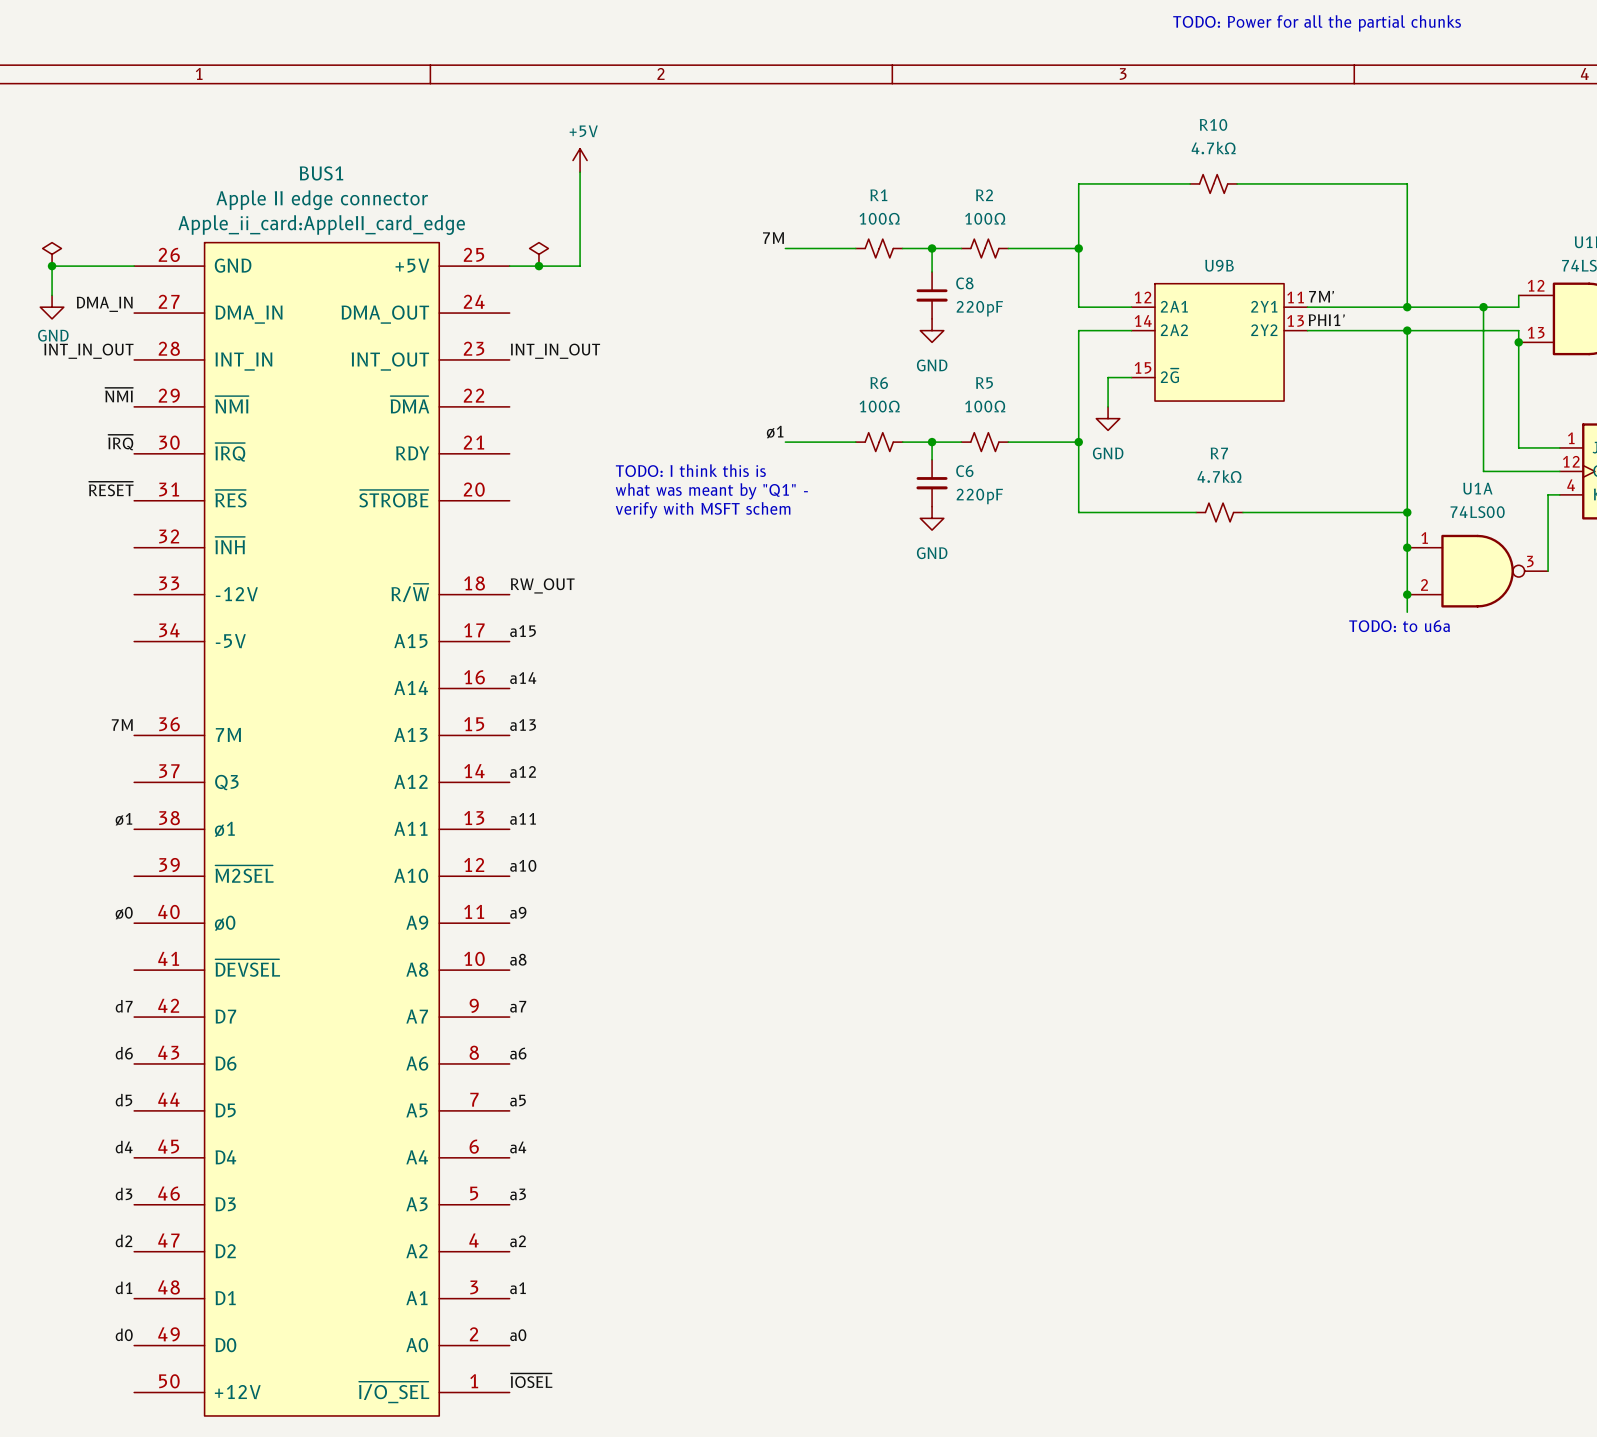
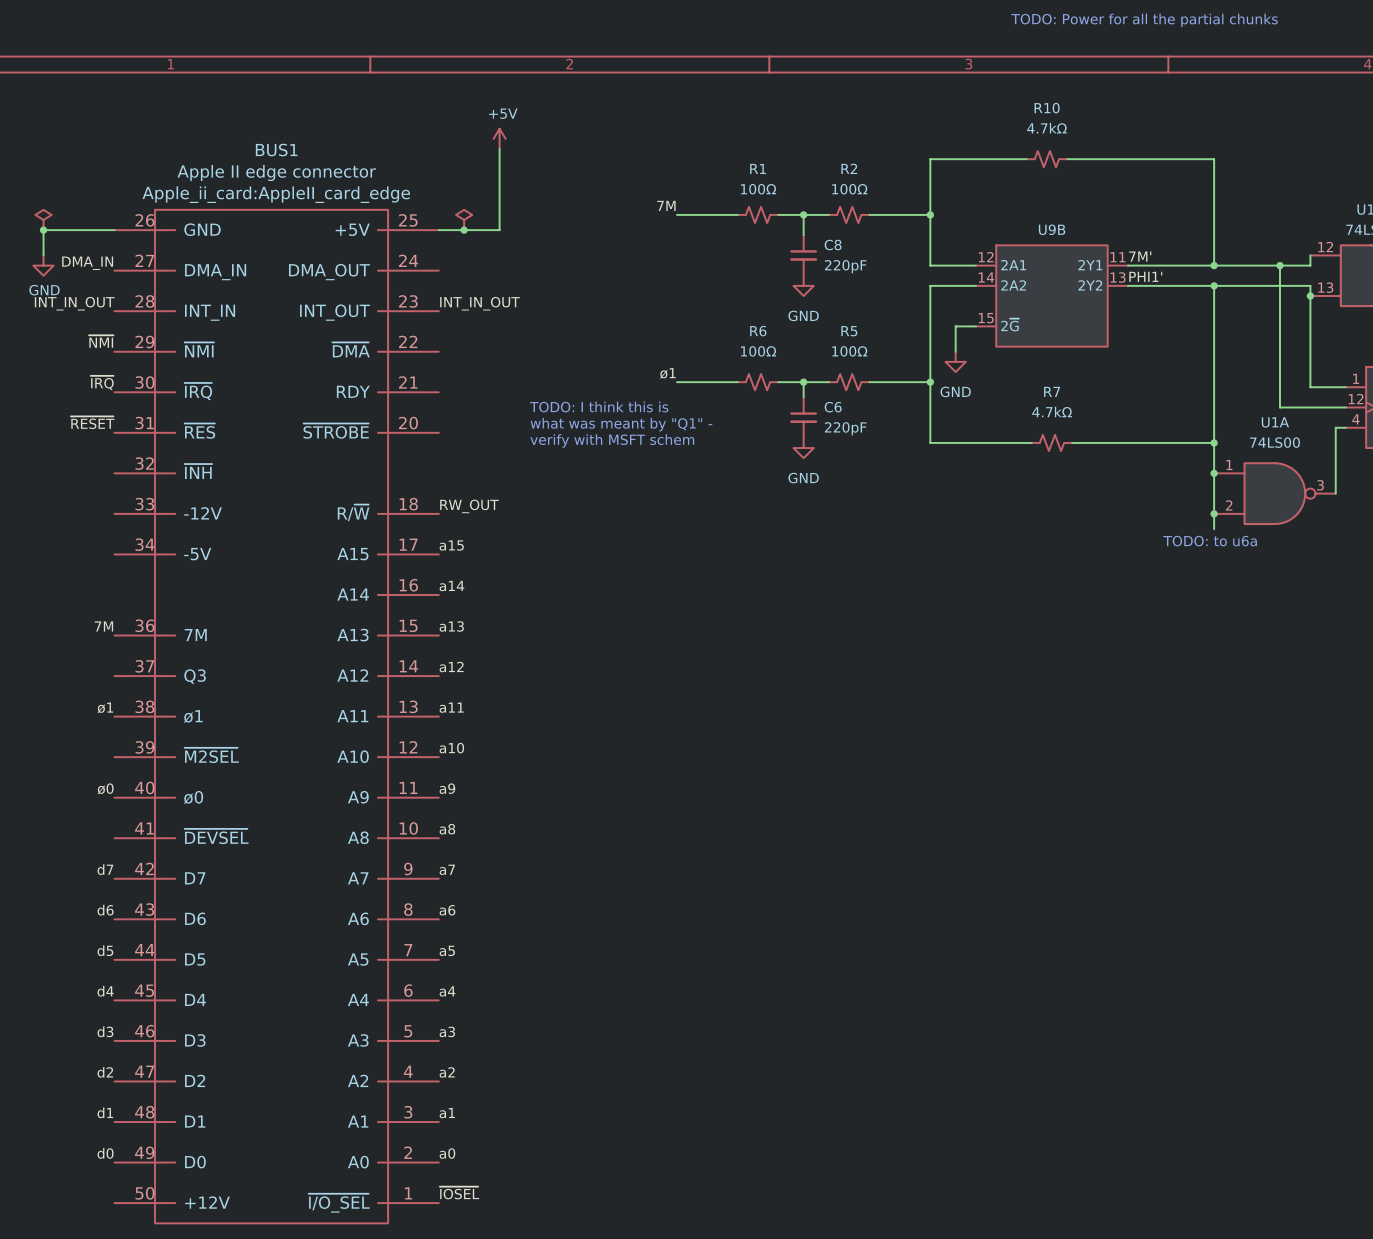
BUS1 symbol: [134, 242, 510, 1416] -> [114, 209, 439, 1224]

